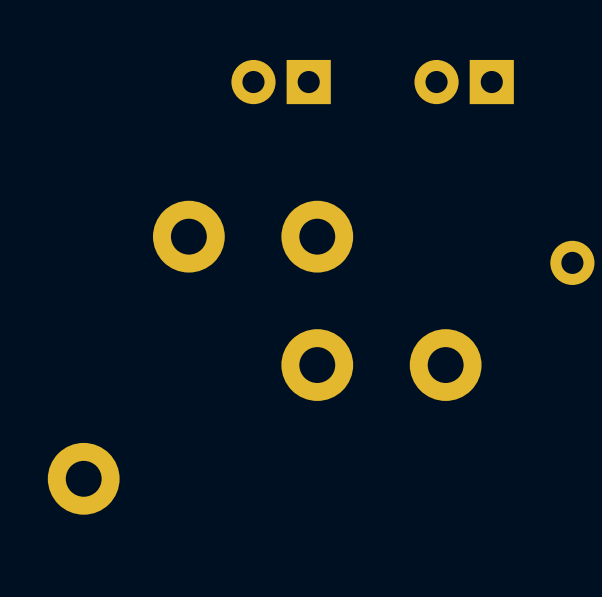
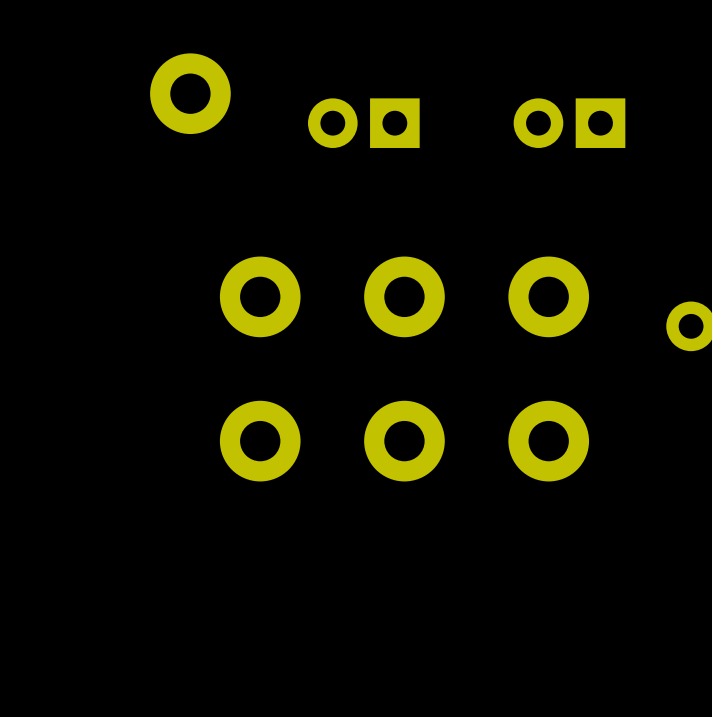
part: none -> (190, 93)
part: none -> (548, 296)
part position: (83, 478) -> (260, 441)

